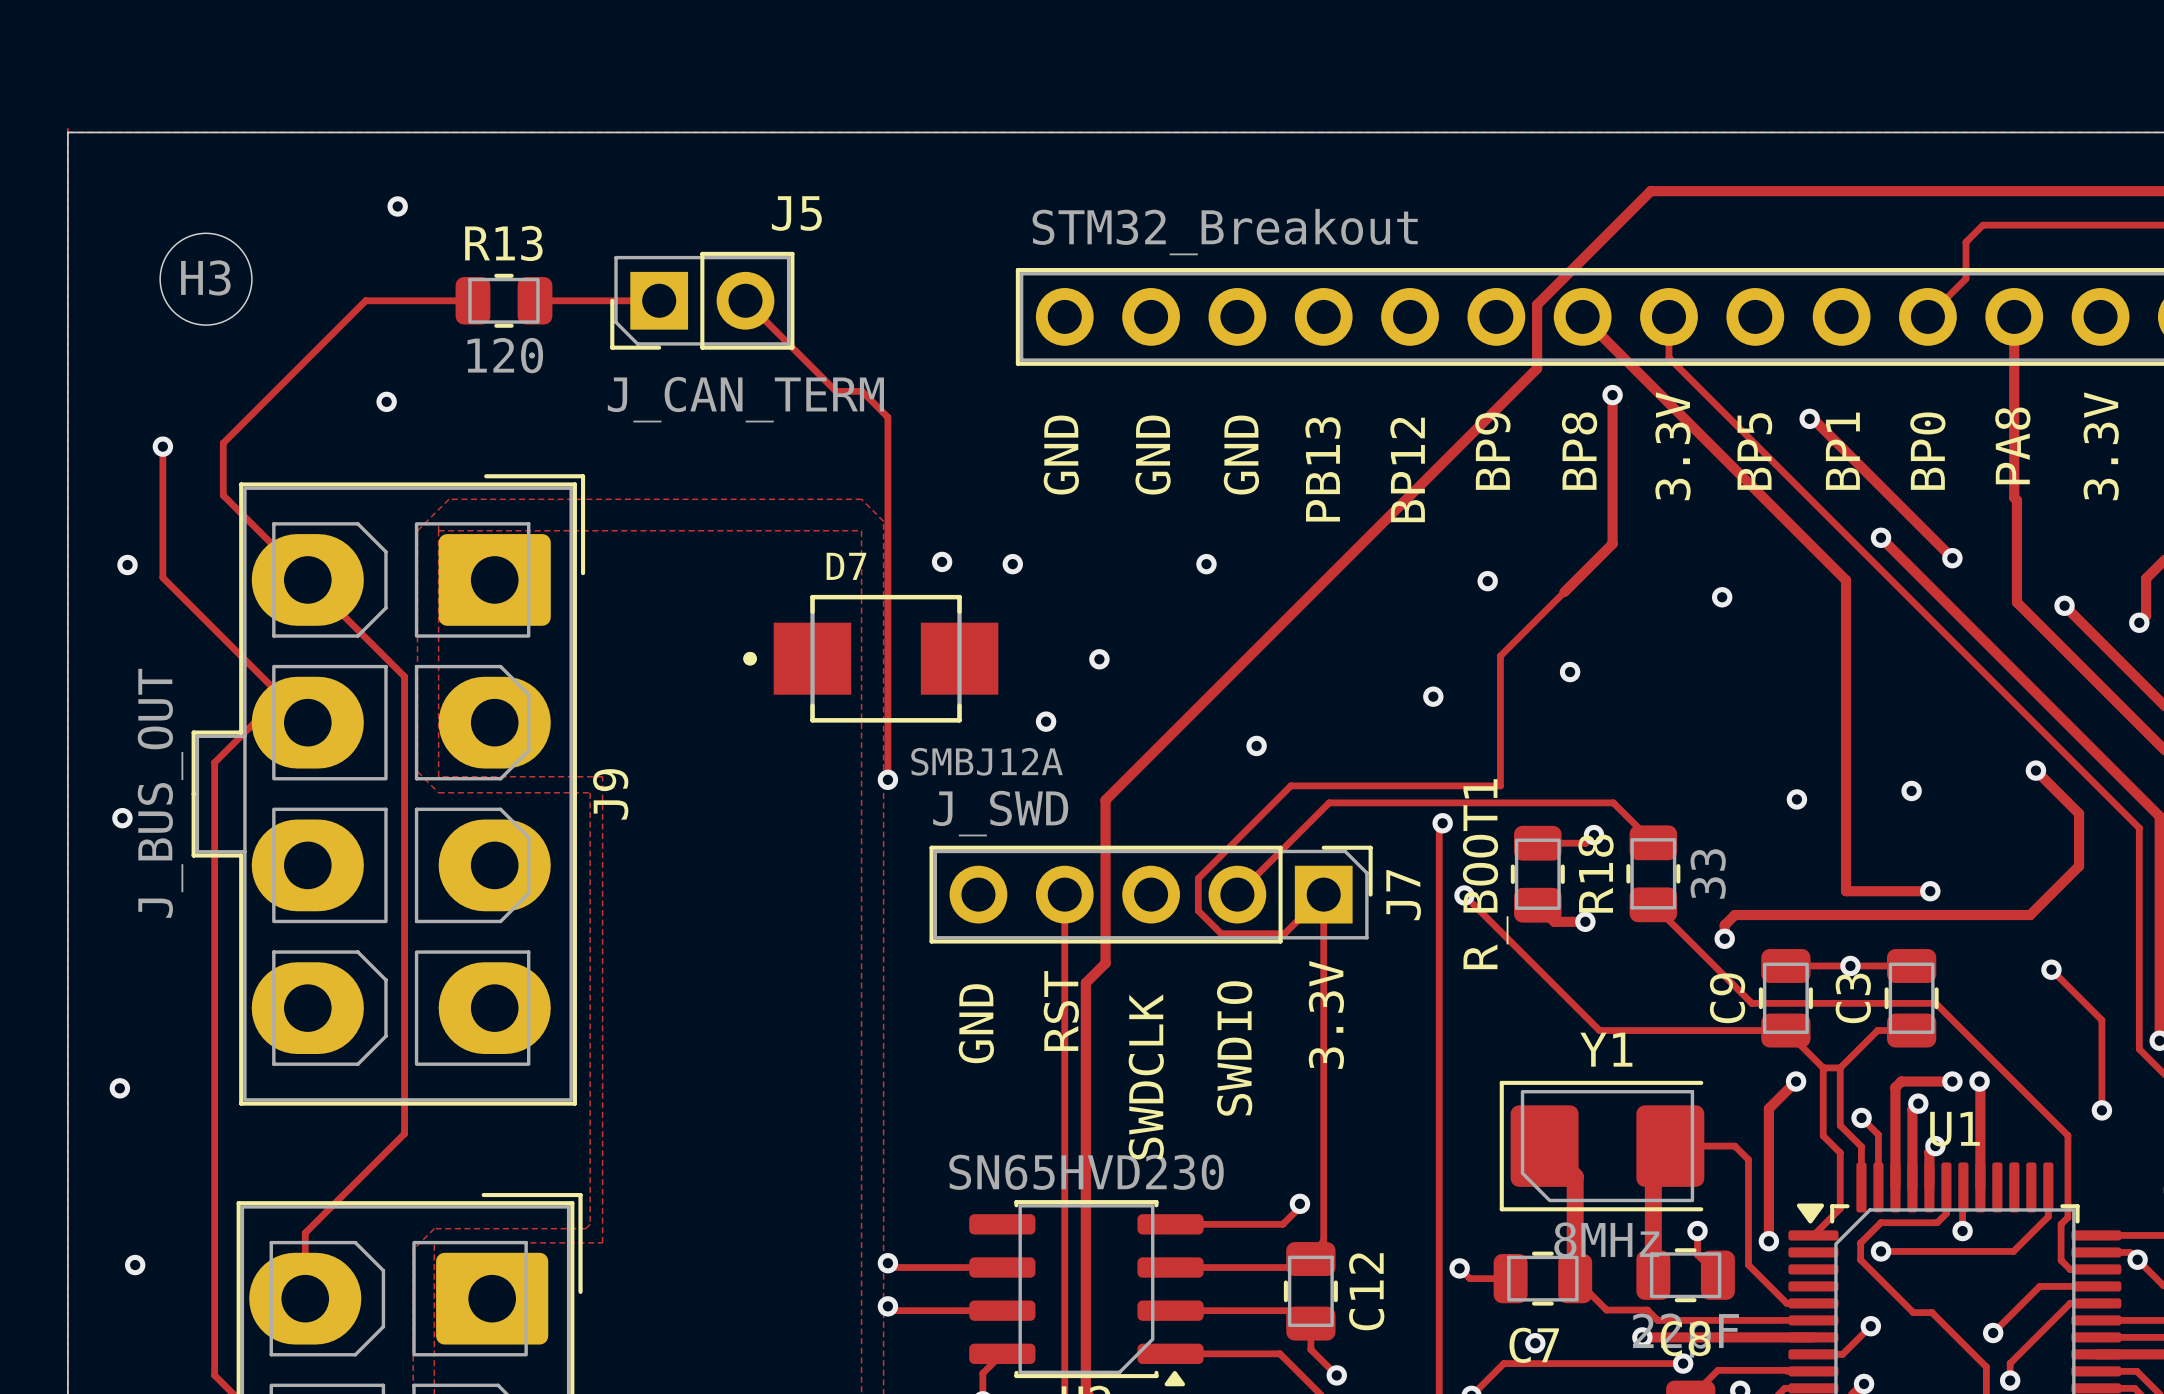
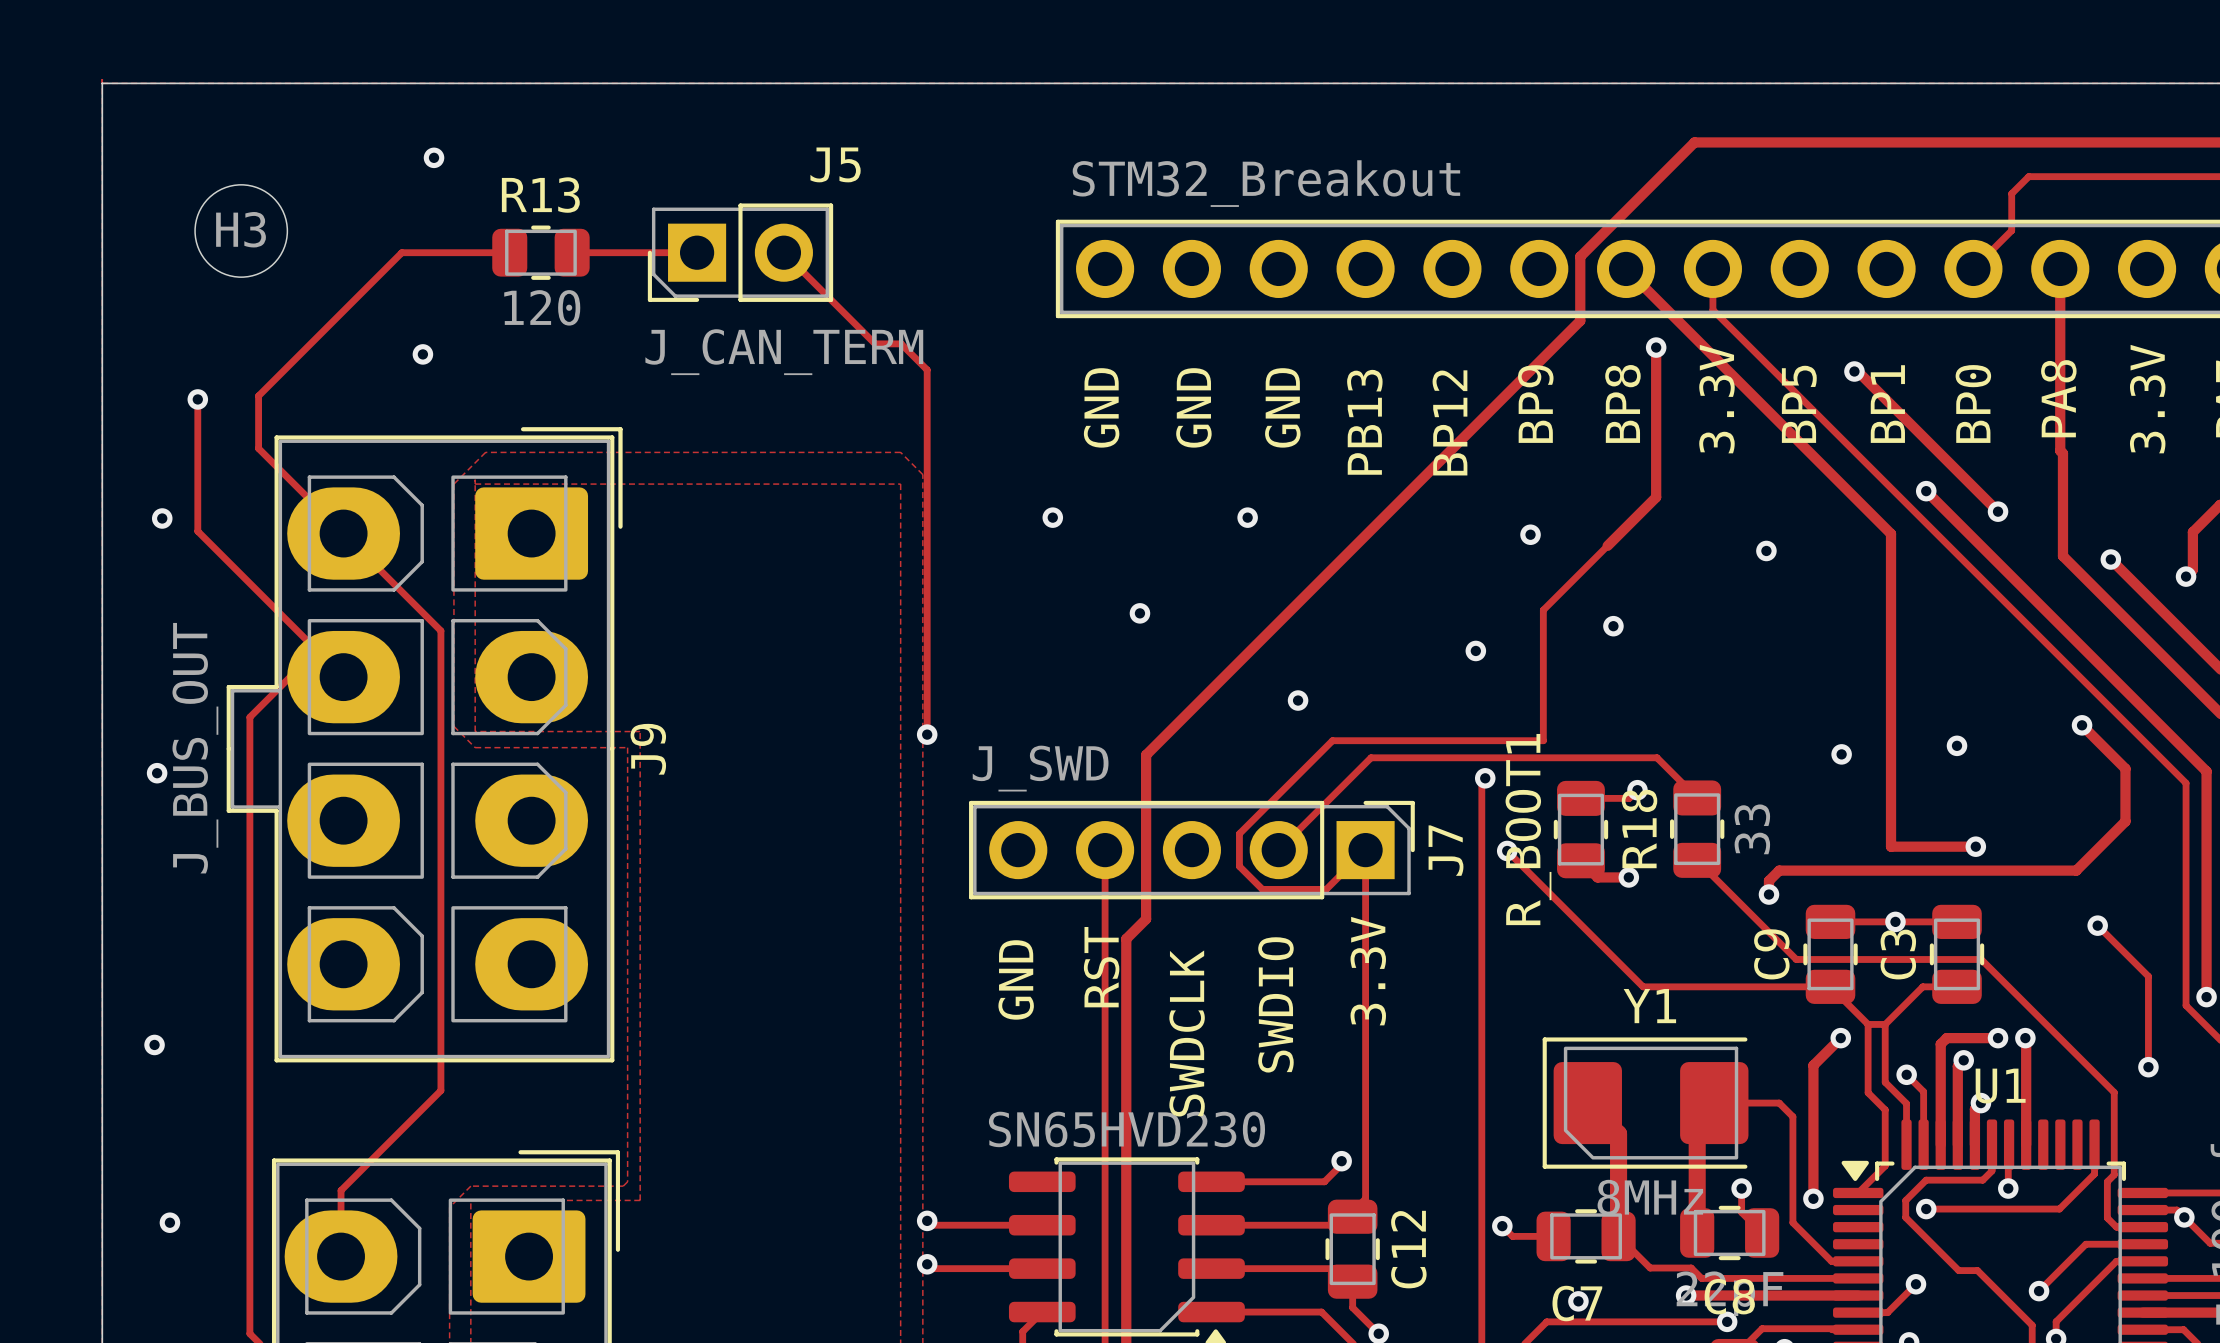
via: (942, 561) -> none
D7: SMBJ12A (870, 658) -> none
via: (1046, 721) -> none

